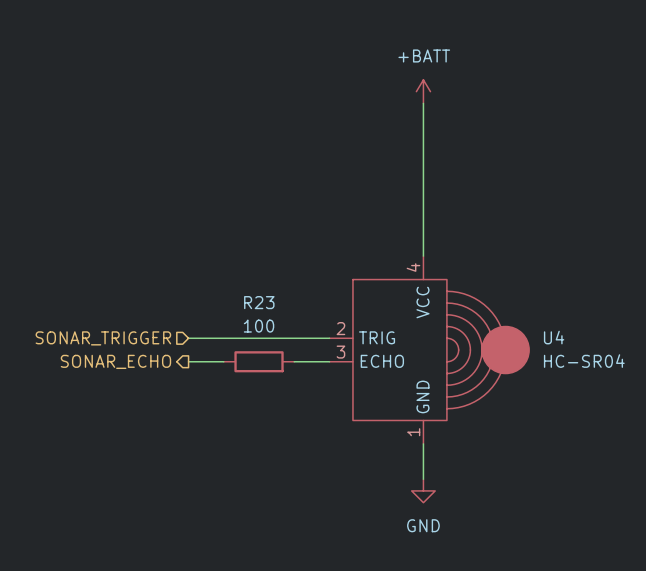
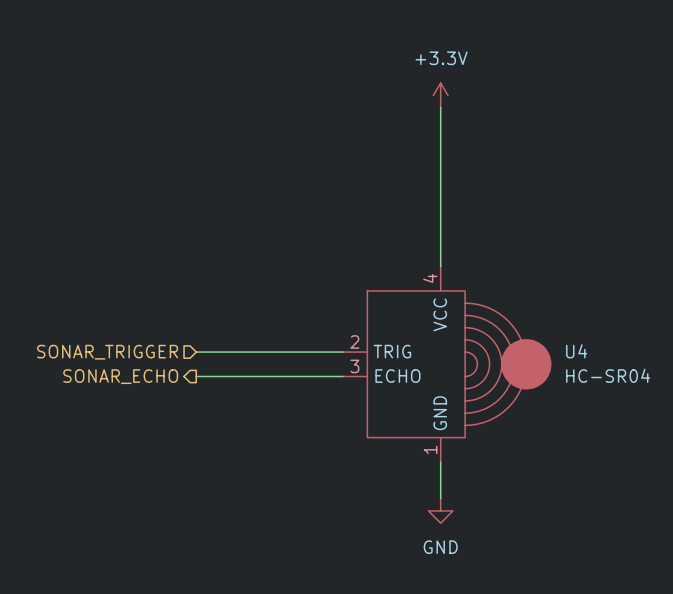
power symbol: +BATT (423, 91) -> +3.3V (440, 95)
wire: none -> (232, 376) (306, 376)
R23: 100 (259, 361) -> none

